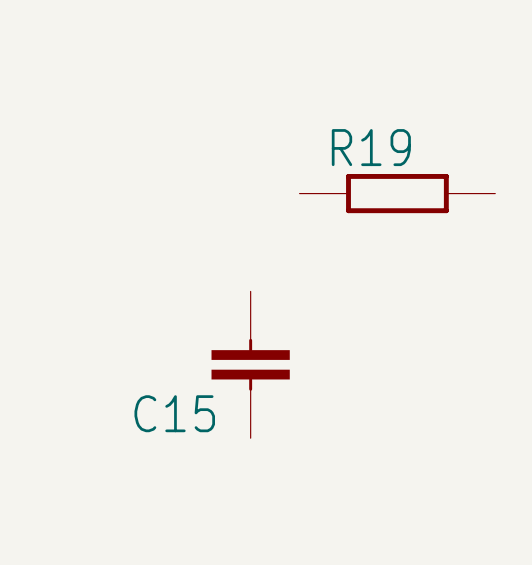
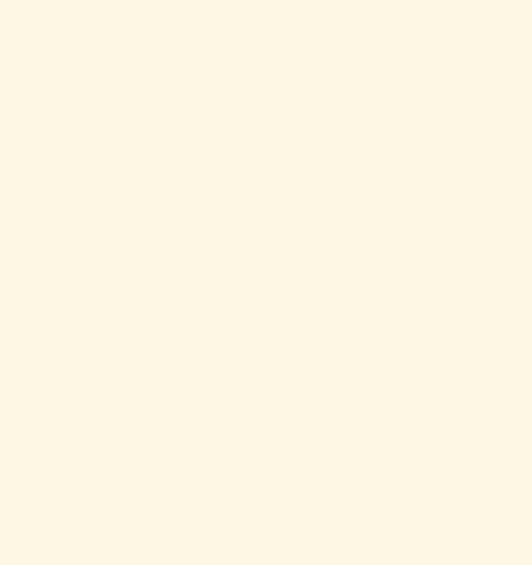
R19: (397, 193) -> none
C15: (250, 364) -> none

